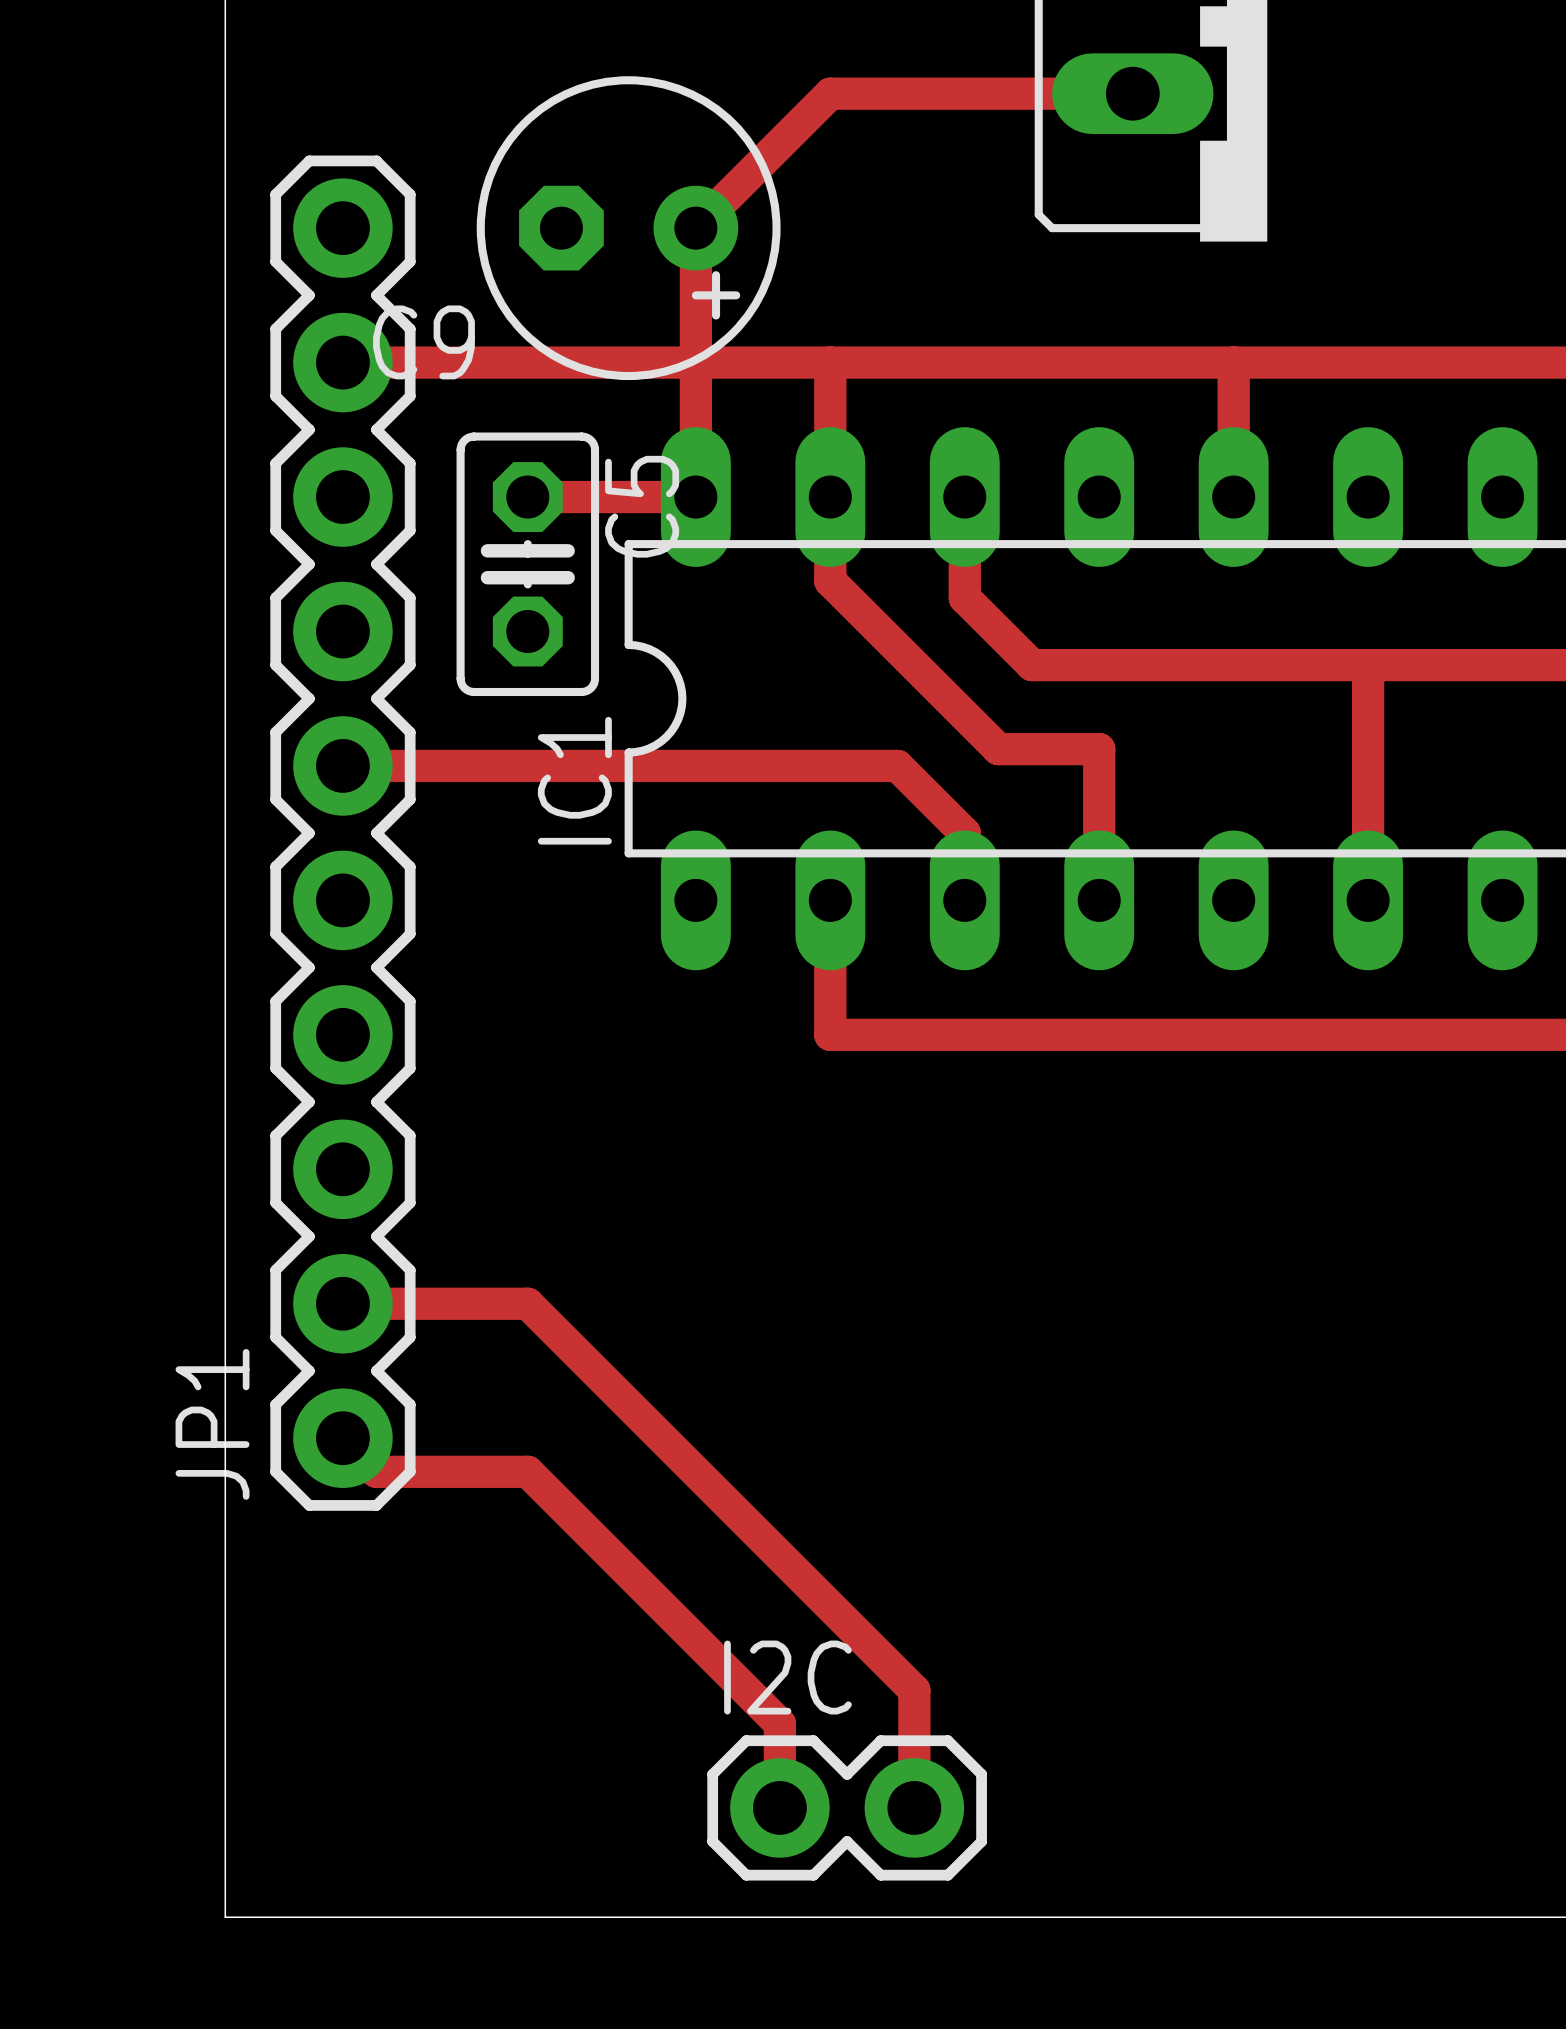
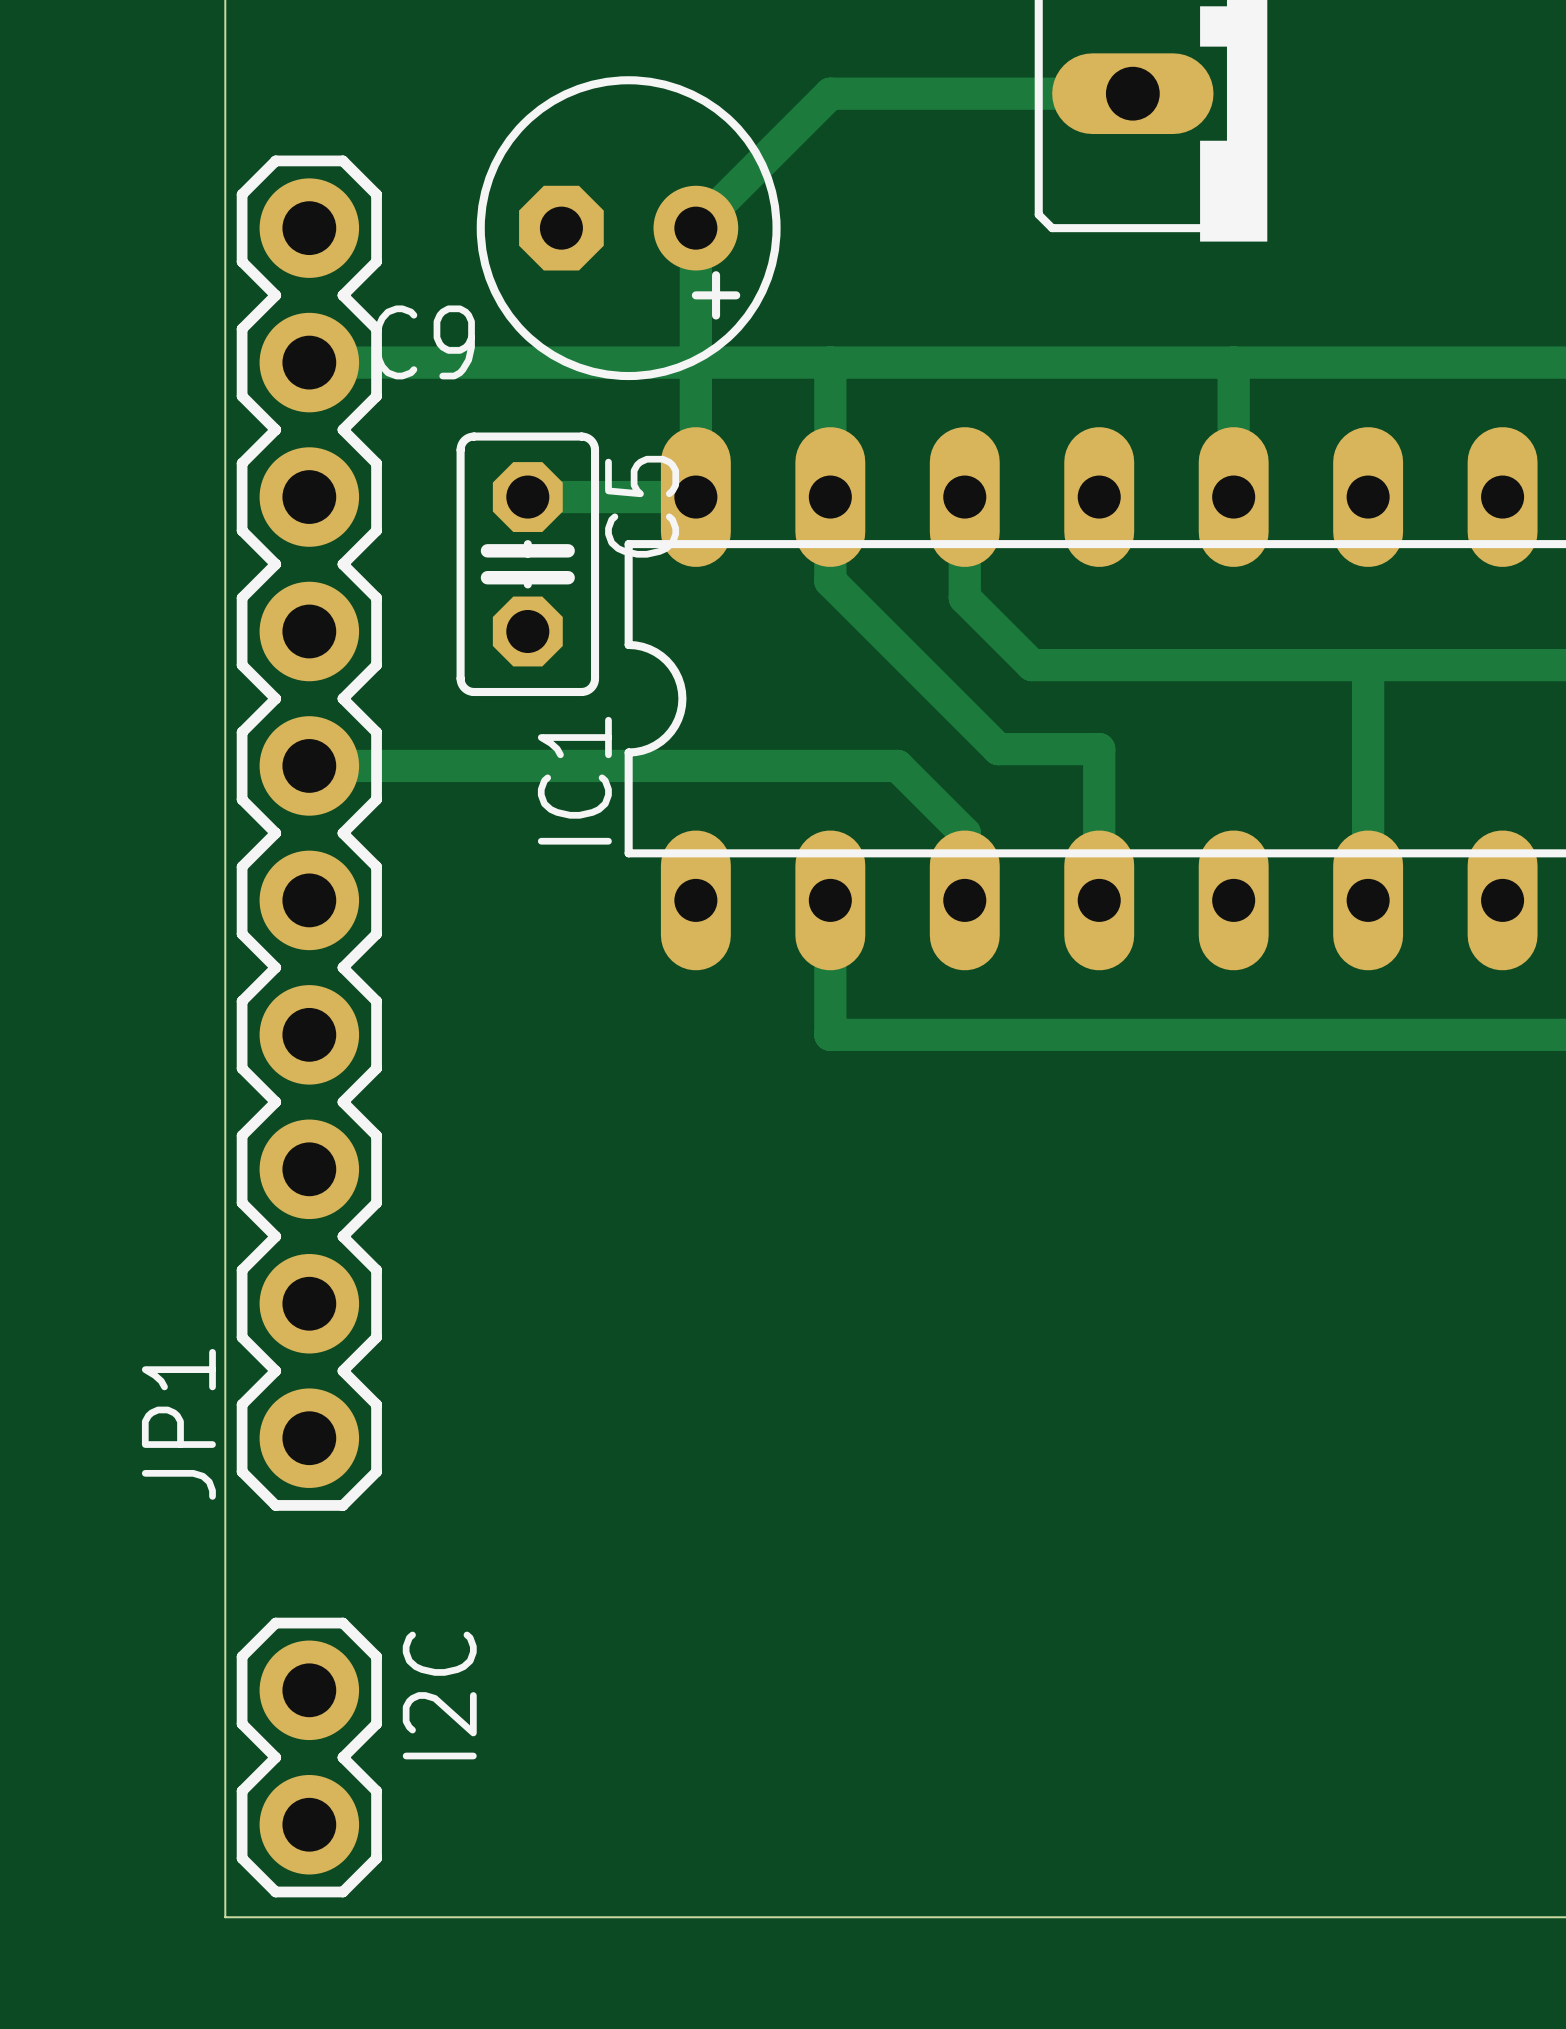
JP1 position: (342, 833) -> (309, 833)
track: (342, 1303) (527, 1303) (914, 1690) (914, 1807) -> none
track: (342, 1438) (376, 1471) (527, 1471) (779, 1723) (779, 1807) -> none
I2C rotation: 0° (847, 1807) -> 90° clockwise (309, 1757)
I2C position: (847, 1807) -> (309, 1757)

